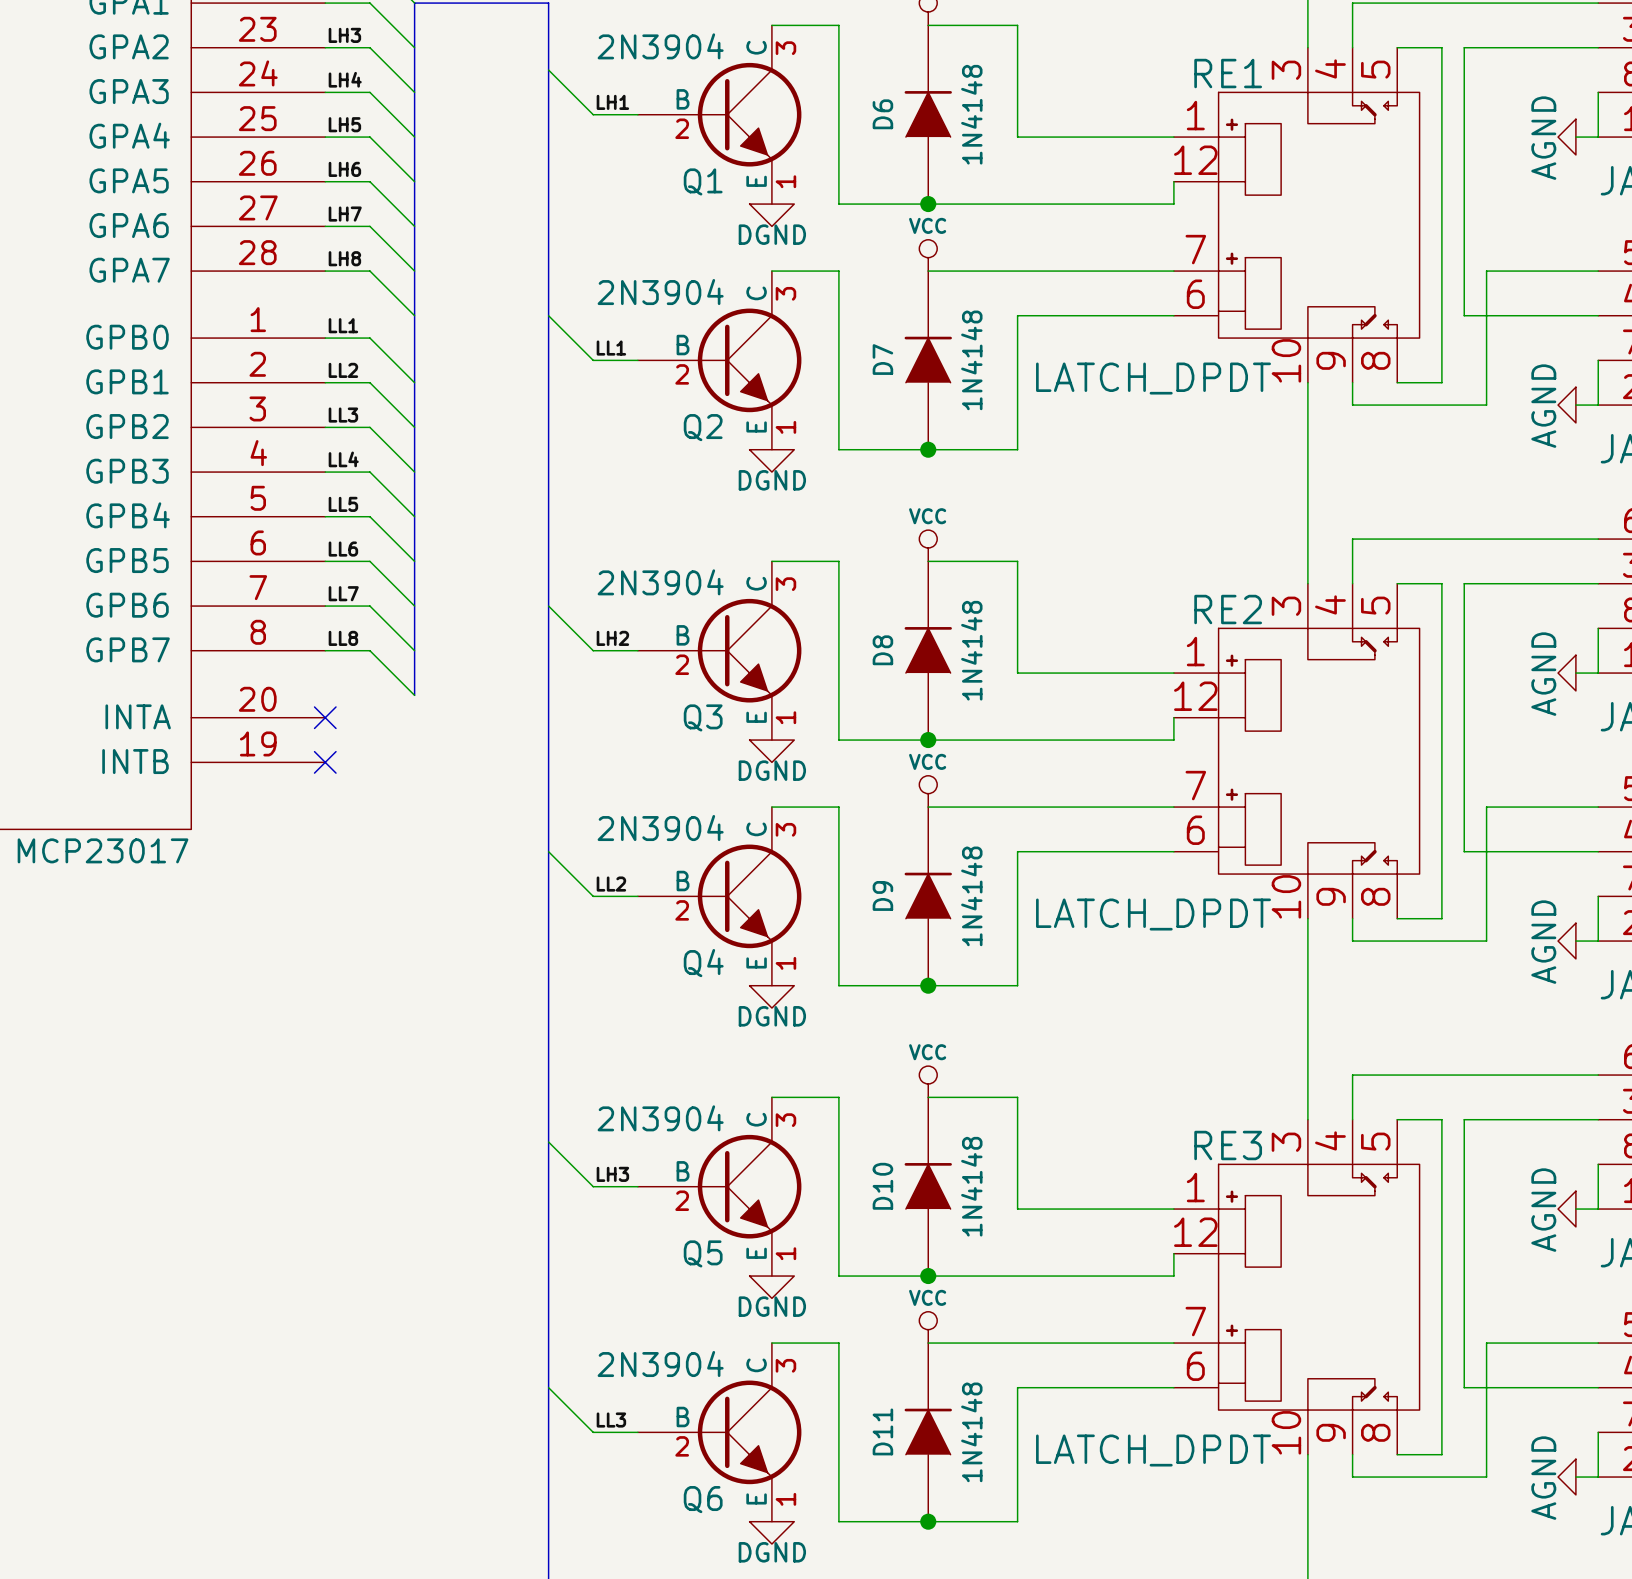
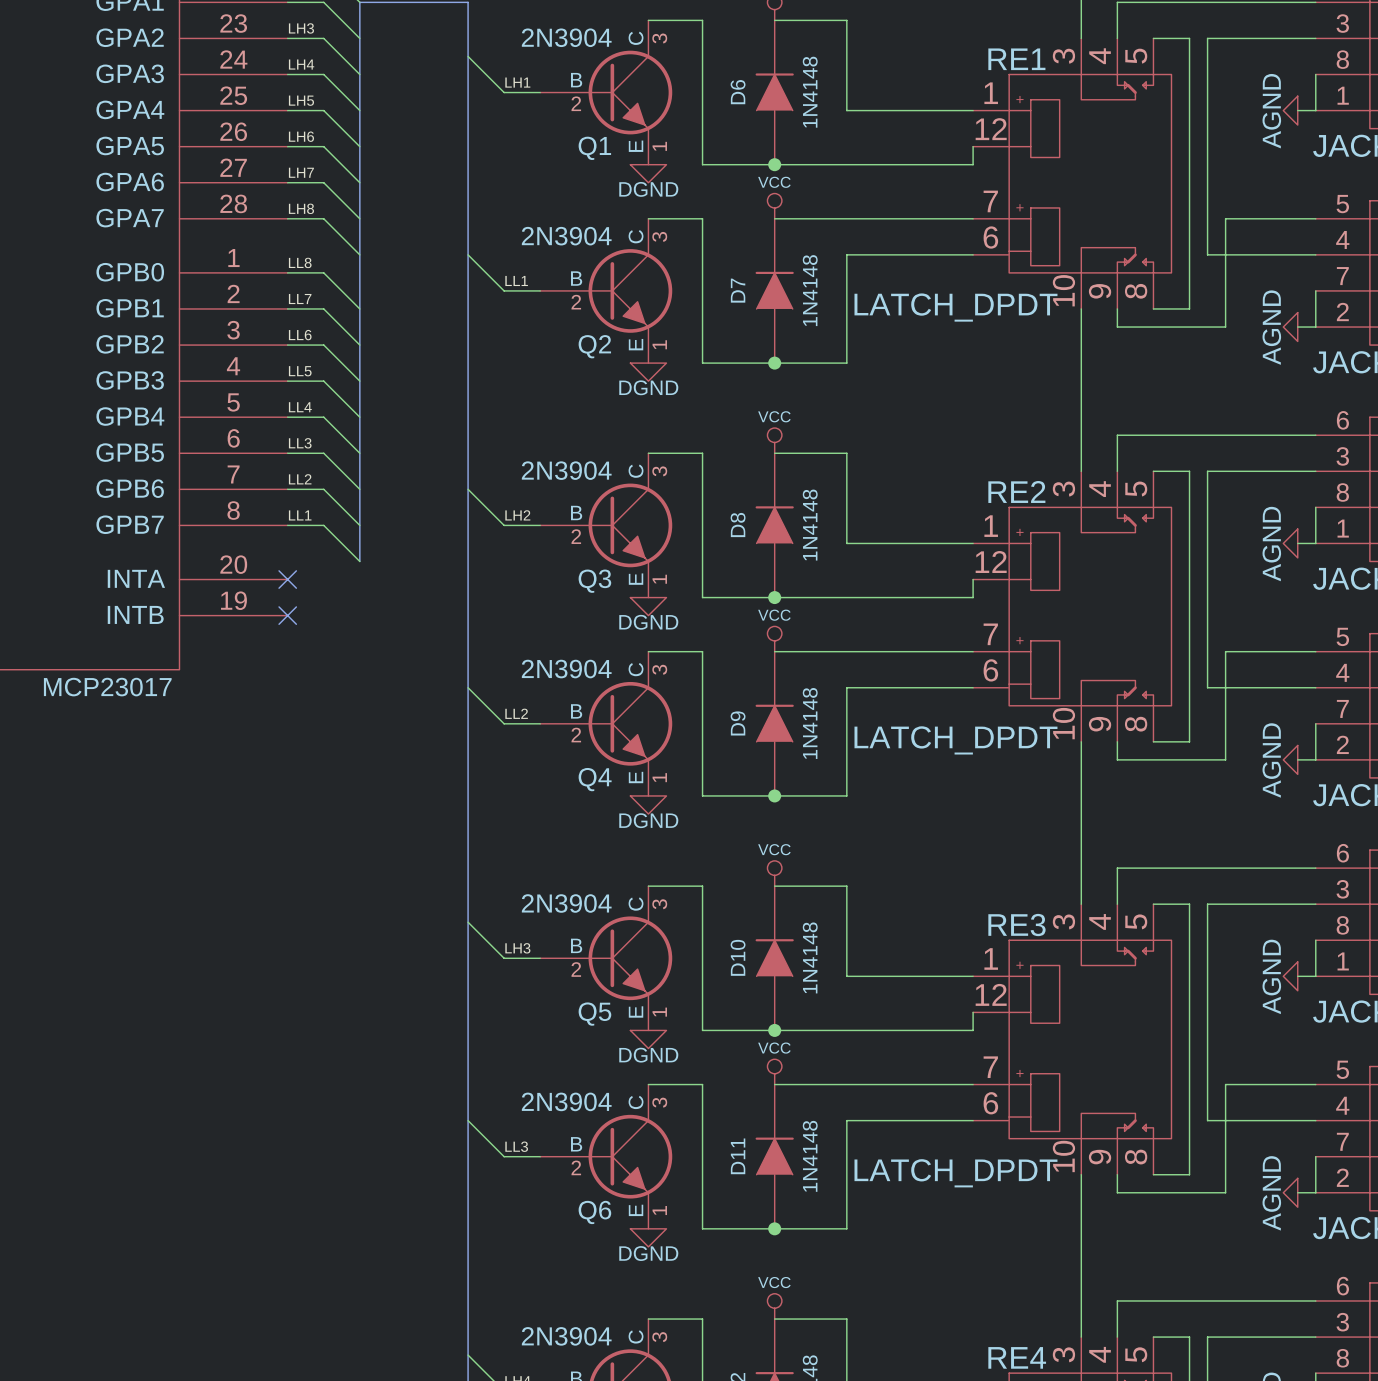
label: LL1 (343, 325) -> LL8 (300, 262)
label: LL2 (343, 370) -> LL7 (300, 299)
label: LL3 (343, 415) -> LL6 (300, 335)
label: LL4 (343, 459) -> LL5 (300, 371)
label: LL5 (343, 504) -> LL4 (300, 407)
label: LL6 (343, 549) -> LL3 (300, 443)
label: LL7 (343, 593) -> LL2 (300, 479)
label: LL8 (343, 638) -> LL1 (300, 515)

